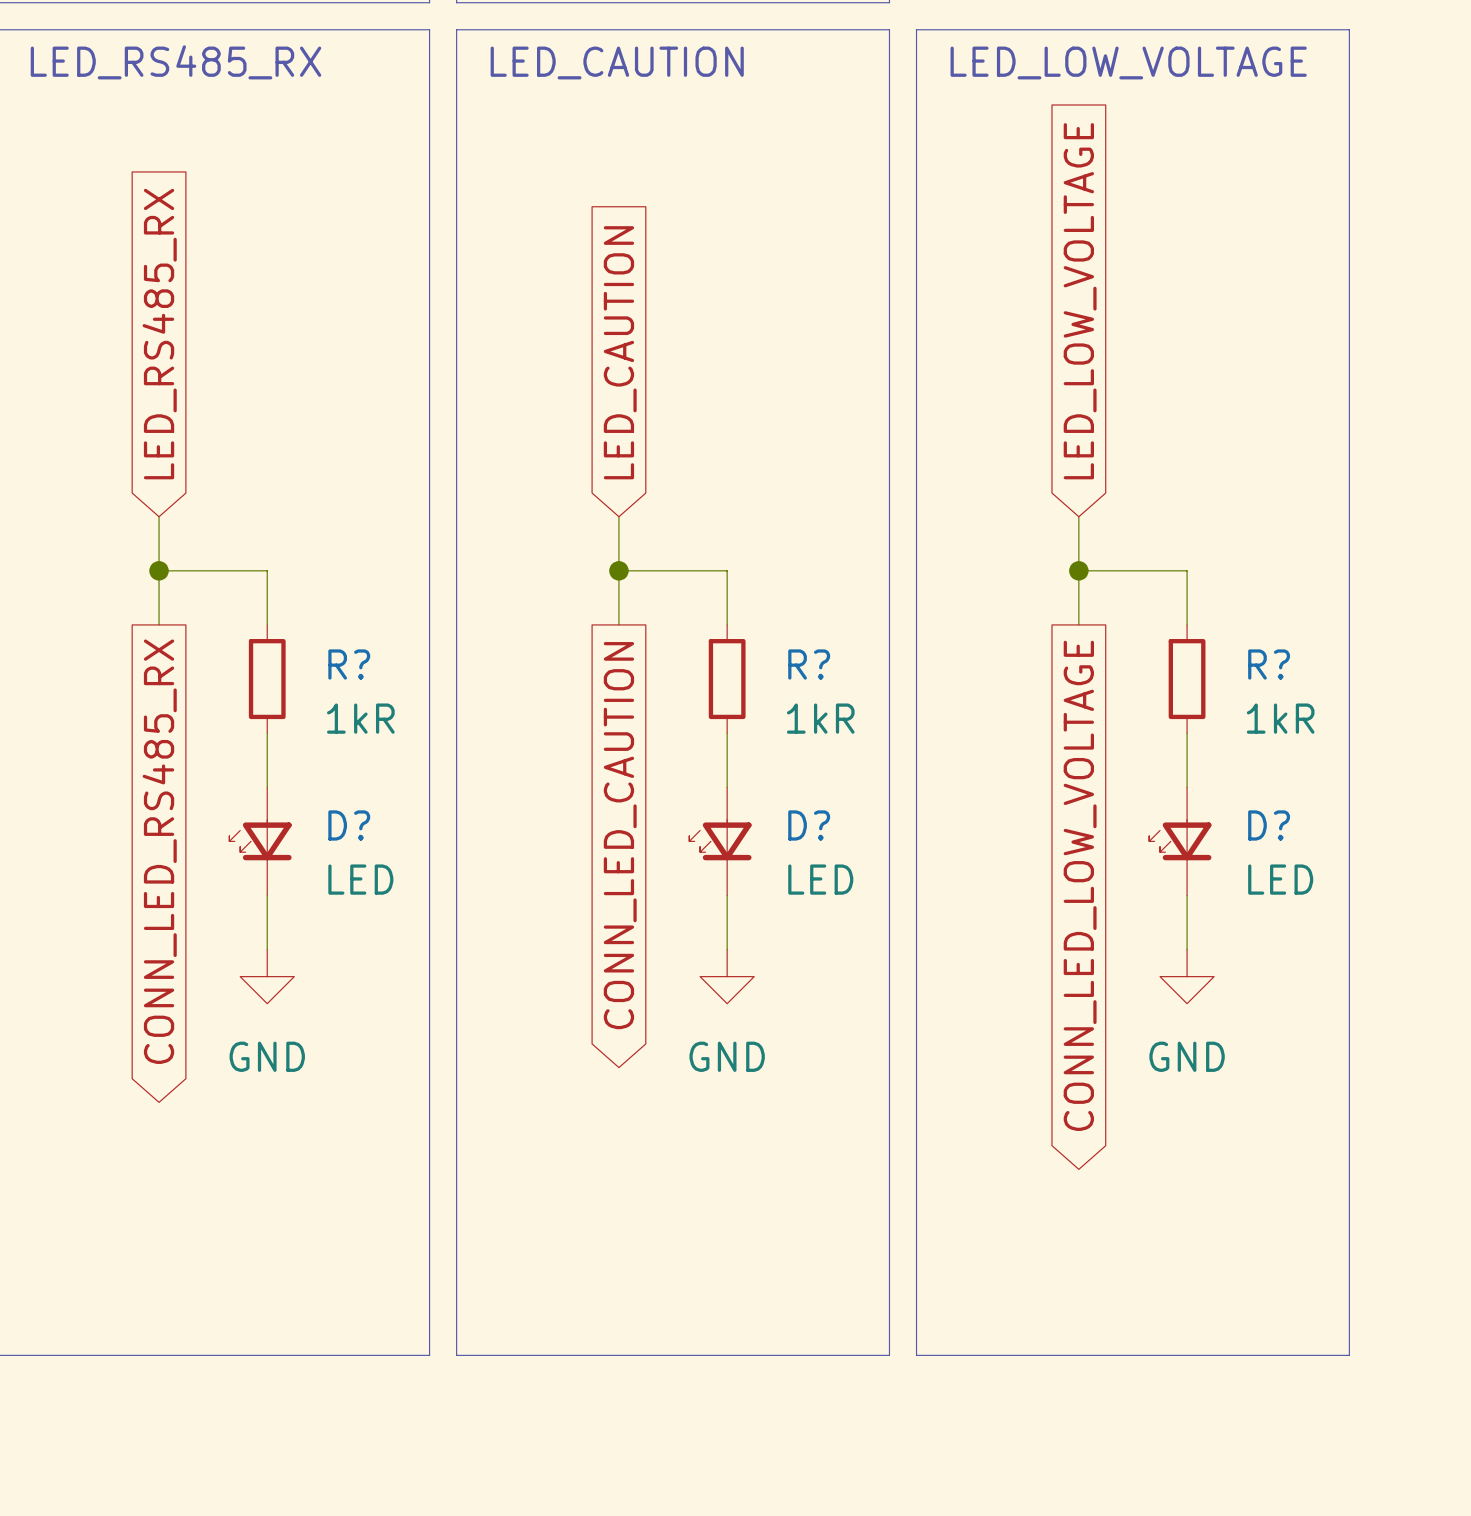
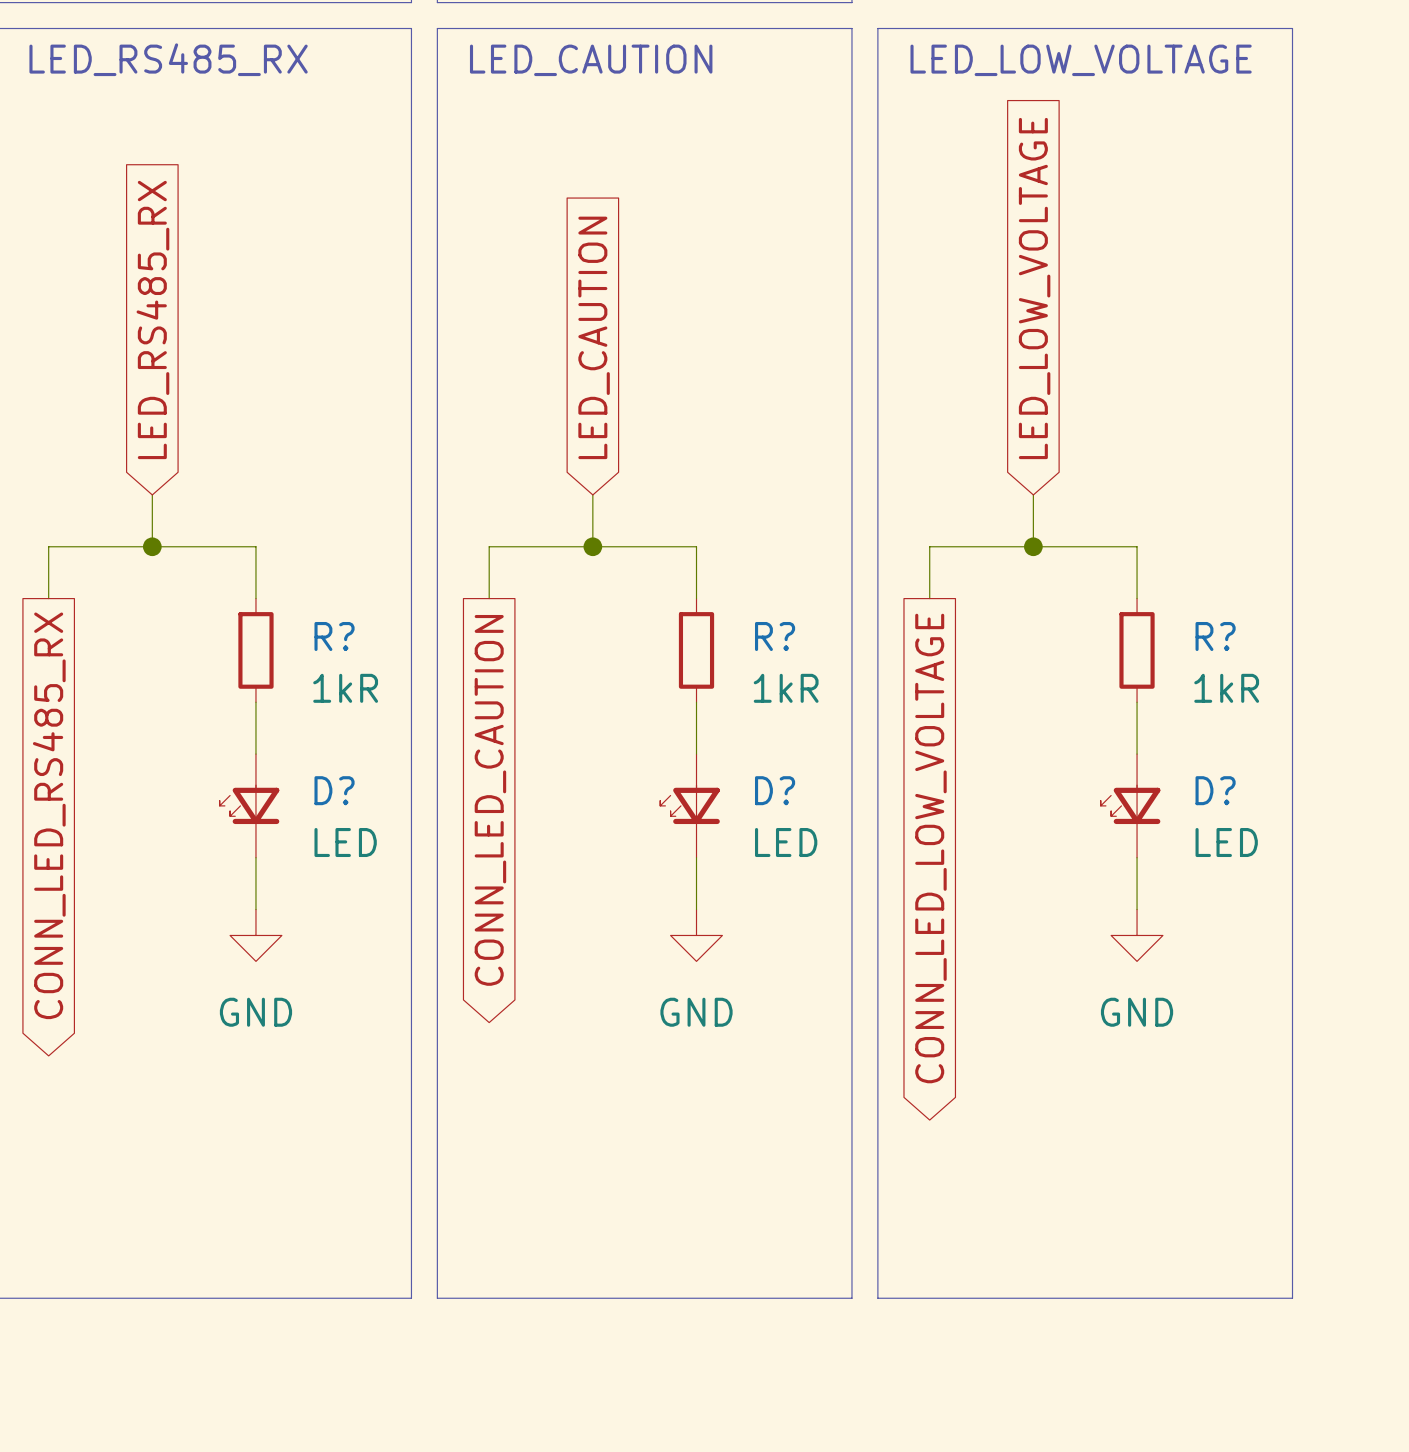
wire: (159, 570) (159, 624) -> (152, 546) (48, 546) (48, 598)
wire: (618, 570) (618, 624) -> (592, 546) (489, 546) (489, 598)
wire: (1078, 570) (1078, 624) -> (1033, 546) (929, 546) (929, 598)
global label position: CONN_LED_CAUTION (620, 835) -> CONN_LED_CAUTION (490, 800)
global label position: CONN_LED_RS485_RX (159, 851) -> CONN_LED_RS485_RX (49, 815)
global label position: CONN_LED_LOW_VOLTAGE (1080, 885) -> CONN_LED_LOW_VOLTAGE (930, 848)

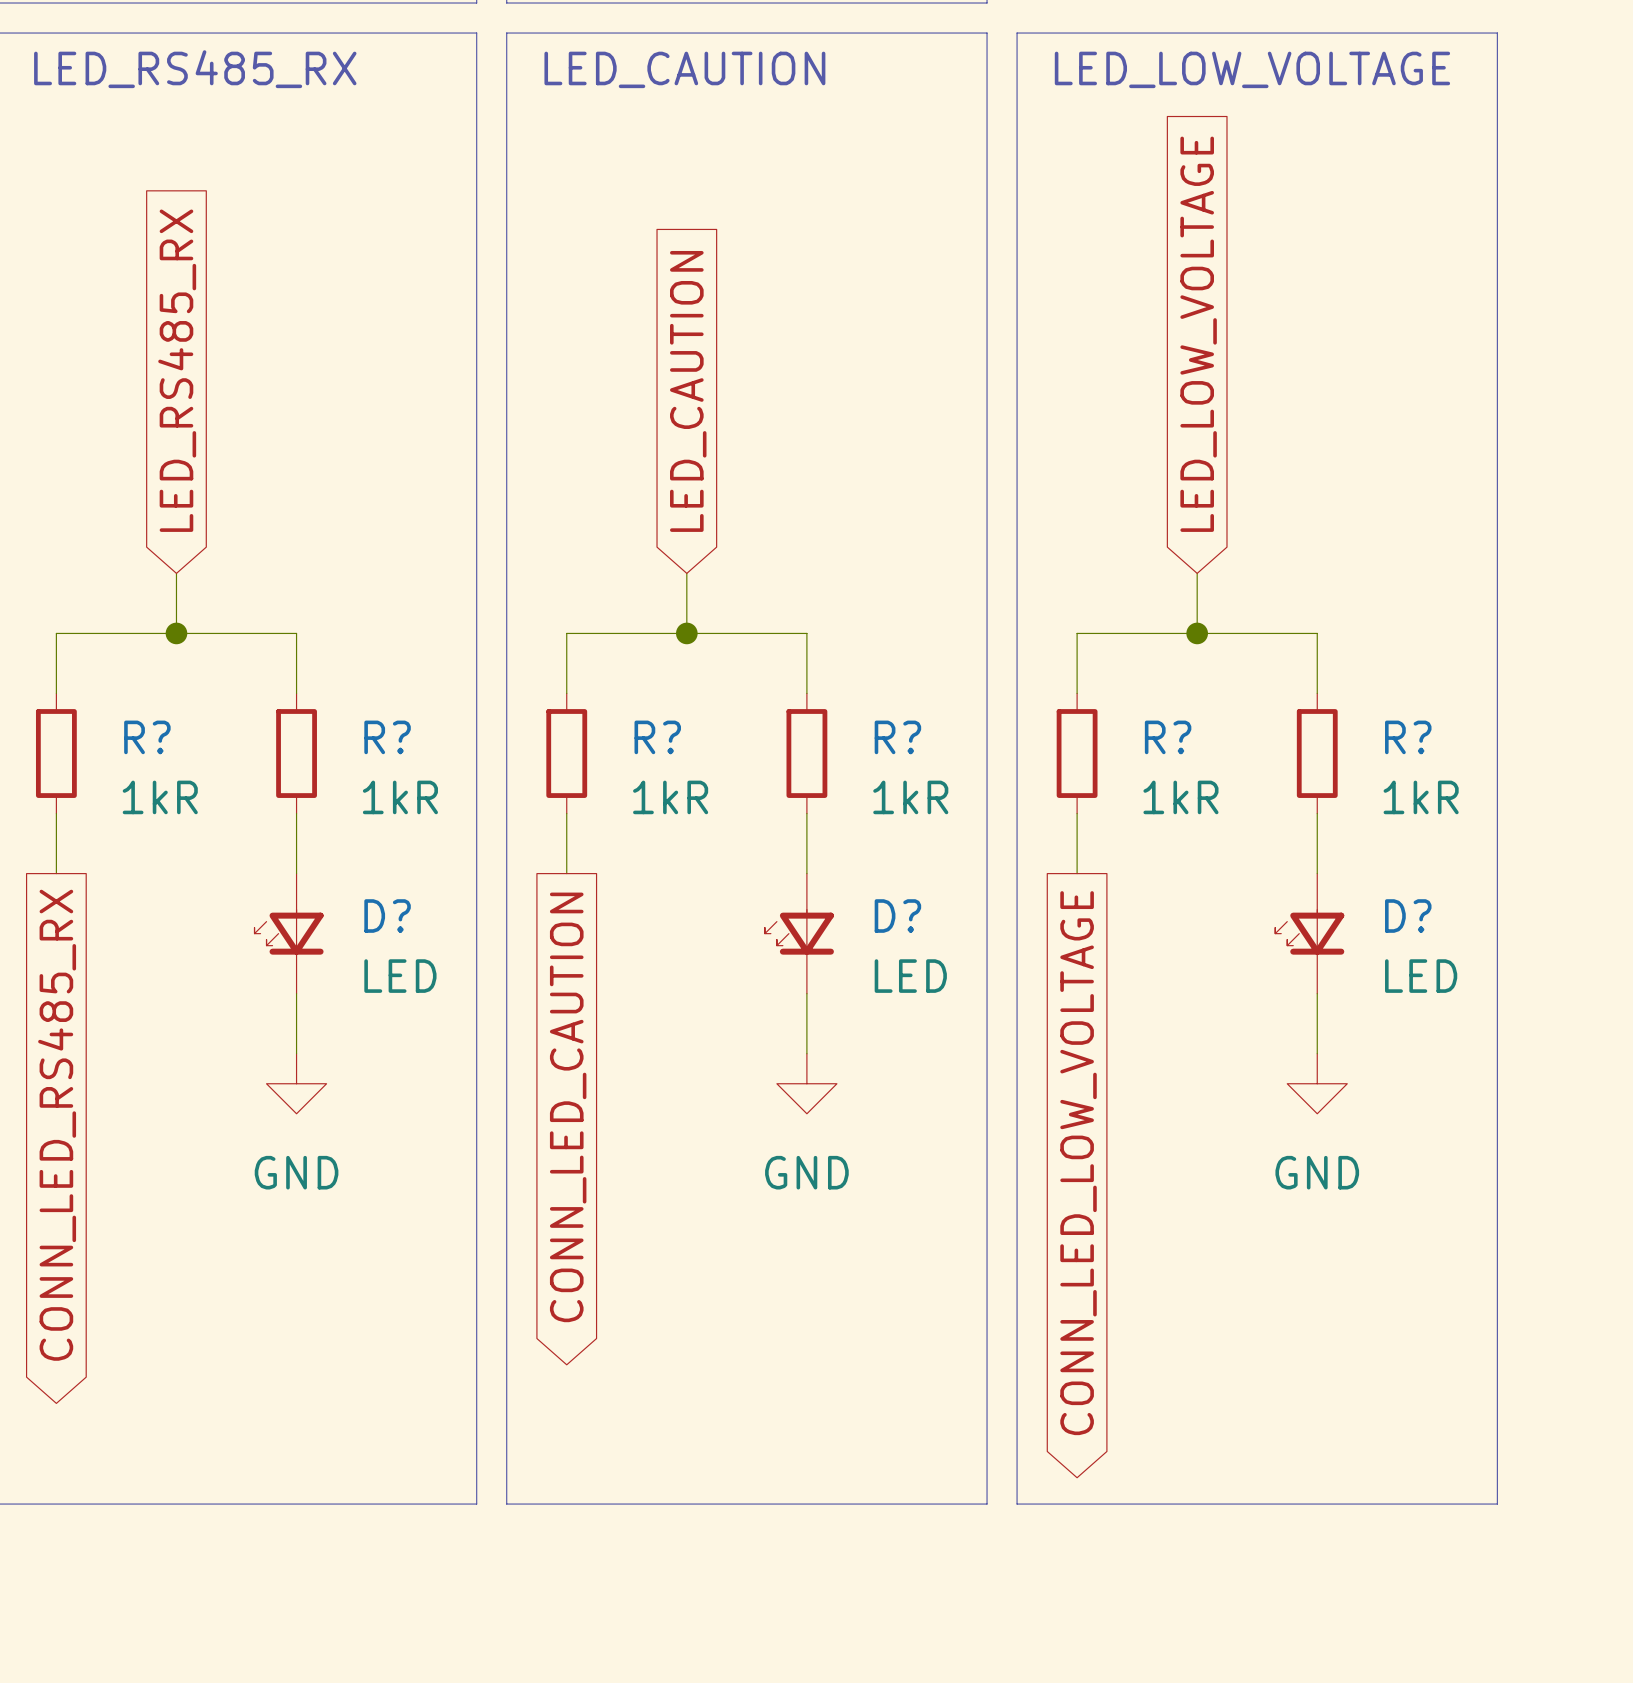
R?: none -> 1kR (56, 753)
R?: none -> 1kR (566, 753)
R?: none -> 1kR (1077, 753)
wire: none -> (56, 813) (56, 873)
wire: none -> (566, 813) (566, 873)
wire: none -> (1077, 813) (1077, 873)
global label position: CONN_LED_CAUTION (490, 800) -> CONN_LED_CAUTION (568, 1107)
global label position: CONN_LED_RS485_RX (49, 815) -> CONN_LED_RS485_RX (57, 1125)
global label position: CONN_LED_LOW_VOLTAGE (930, 848) -> CONN_LED_LOW_VOLTAGE (1078, 1163)

